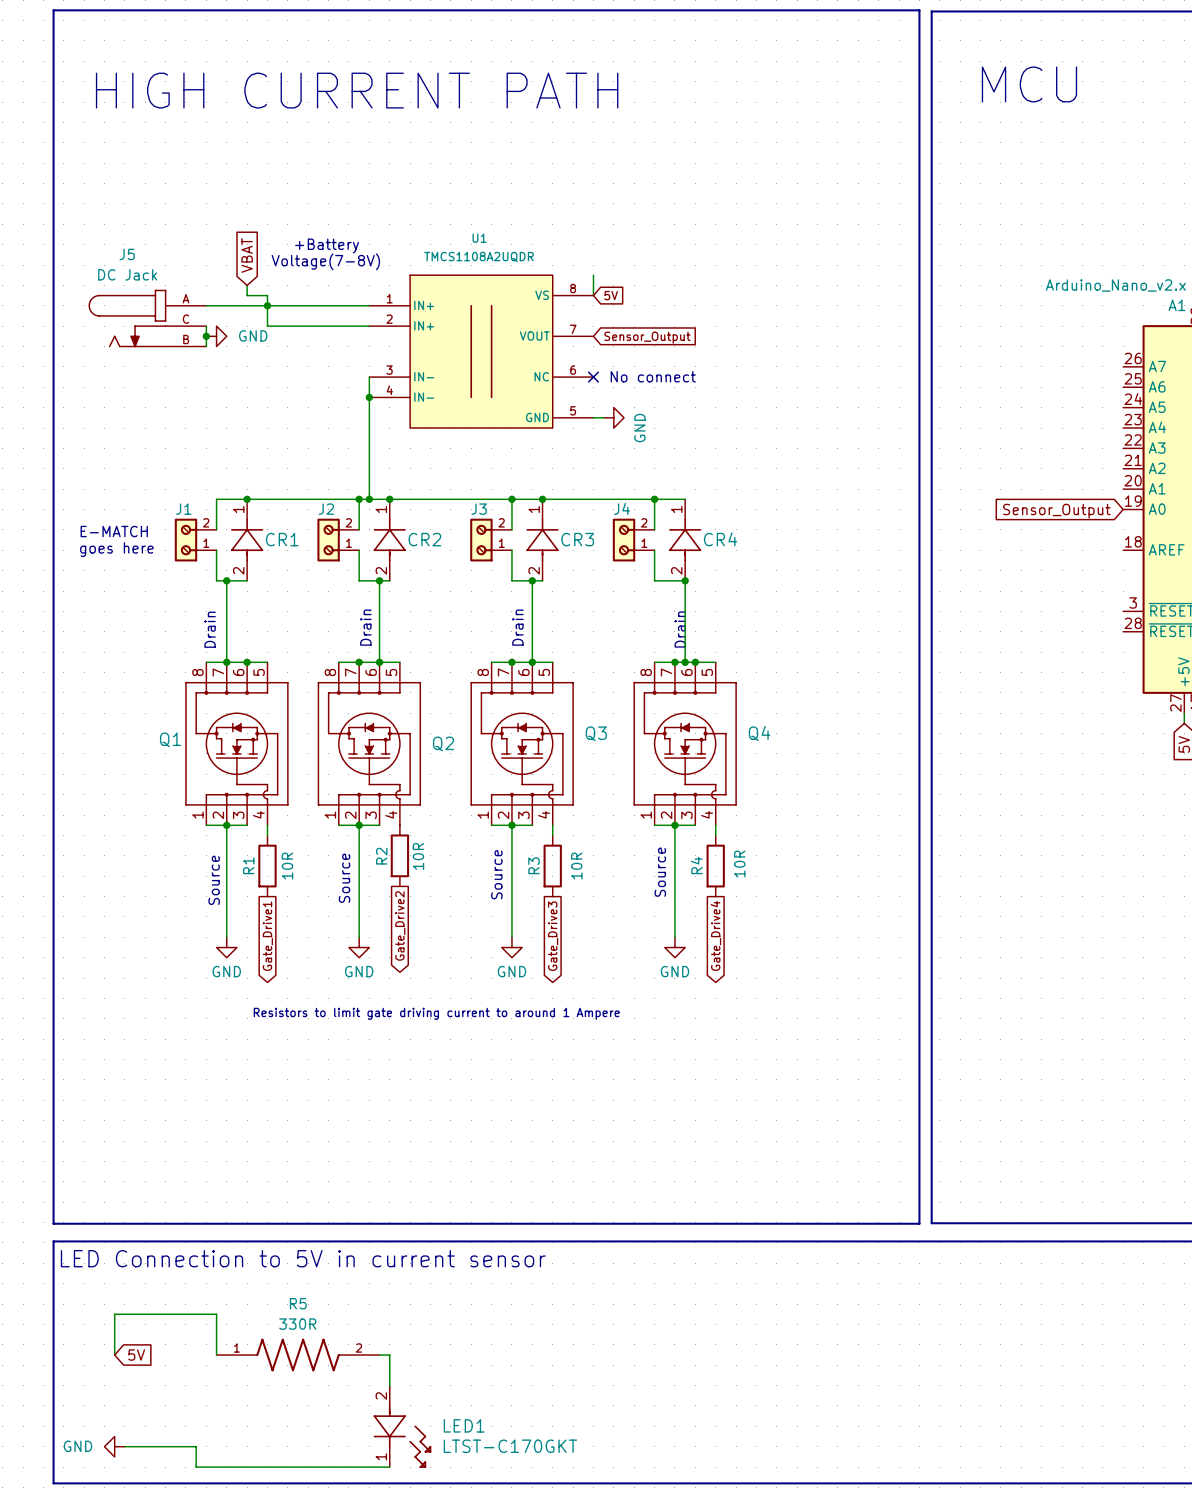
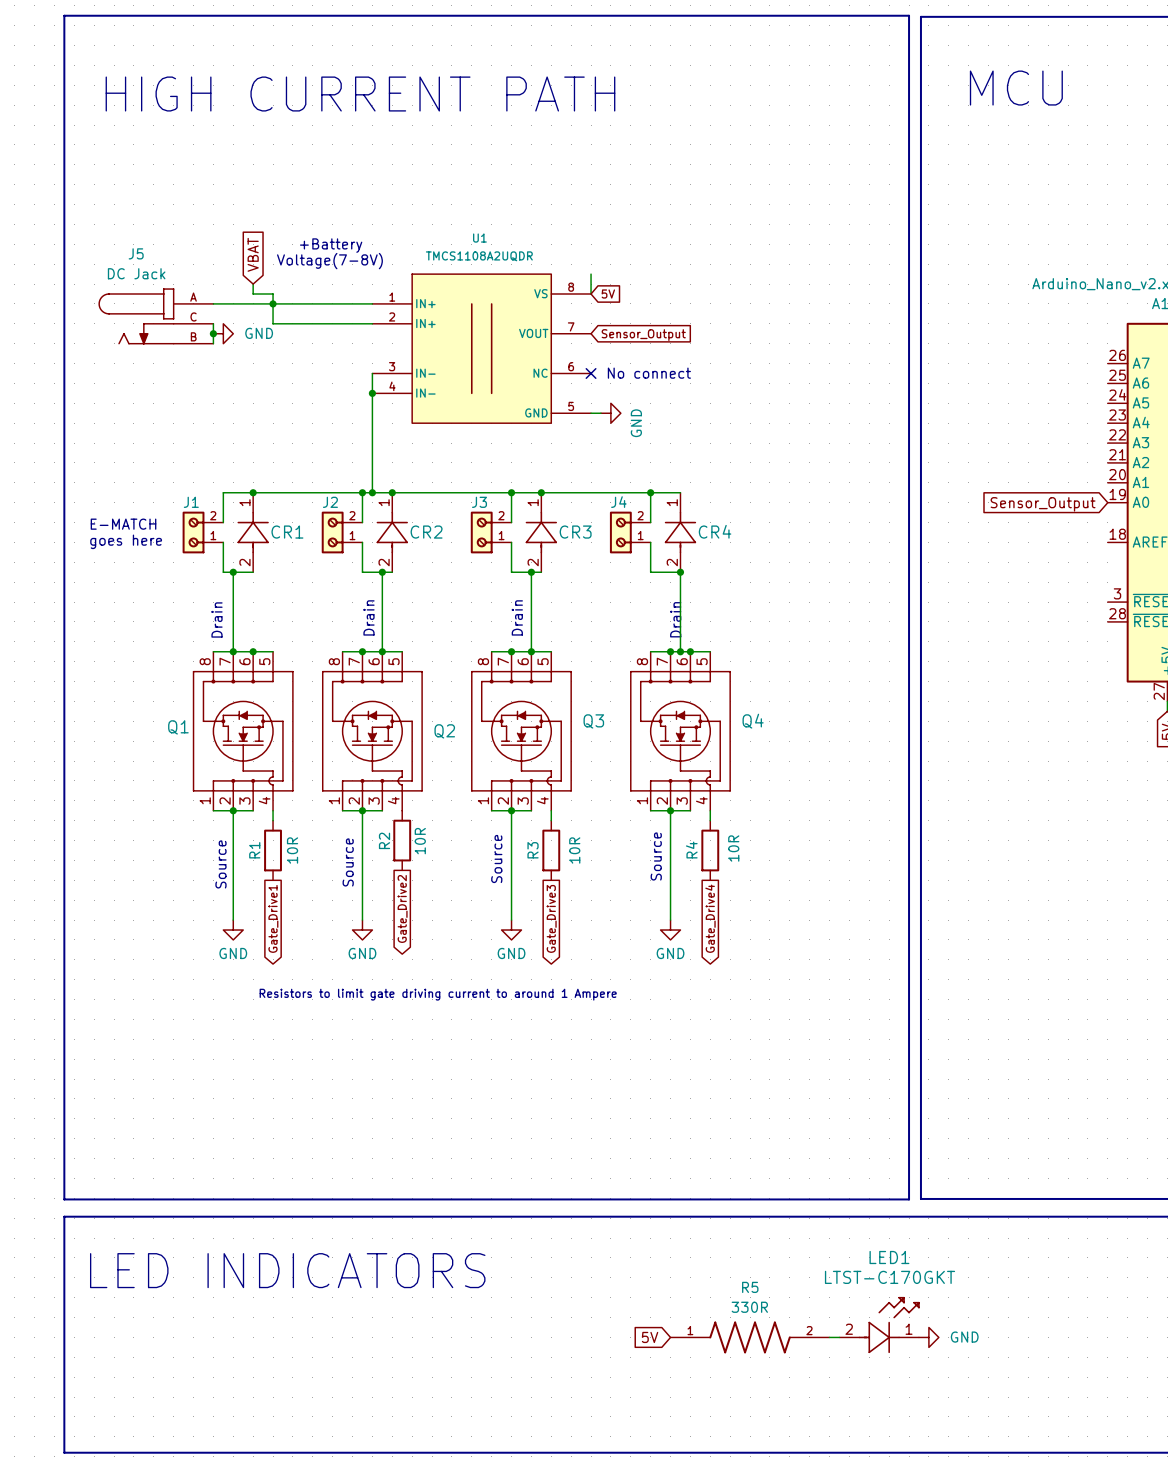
text: LED Connection to 5V in current sensor (303, 1258) -> none
text: none -> LED INDICATORS (287, 1270)
wire: (114, 1355) (114, 1314) (216, 1314) (216, 1355) -> none
global label: 5V (136, 1355) -> none
R5 position: (298, 1355) -> (750, 1337)
wire: (379, 1355) (389, 1355) (389, 1385) -> none
global label: none -> 5V (650, 1337)
wire: none -> (829, 1337) (839, 1337)
power symbol: none -> GND (928, 1337)
LED1 position: (402, 1426) -> (879, 1325)
LED1 rotation: 0° (402, 1436) -> 90° counterclockwise (889, 1325)
power symbol: GND (114, 1446) -> none
wire: (124, 1446) (196, 1446) (196, 1467) (389, 1467) -> none
LED1 value position: LTST-C170GKT (510, 1446) -> LTST-C170GKT (890, 1277)

